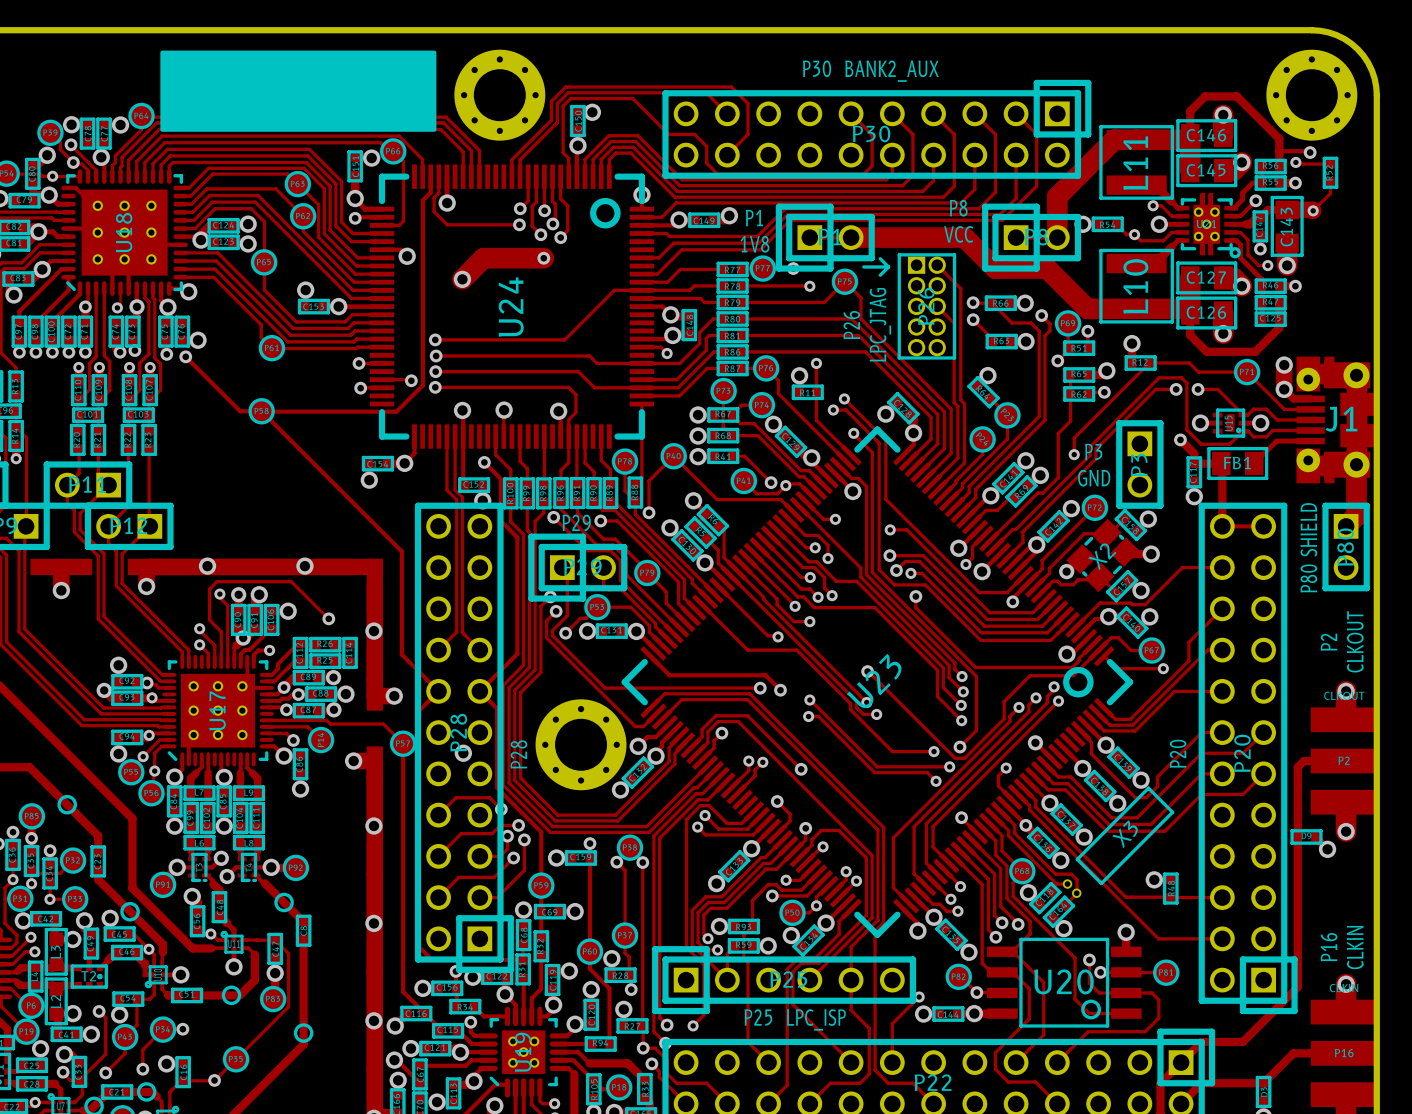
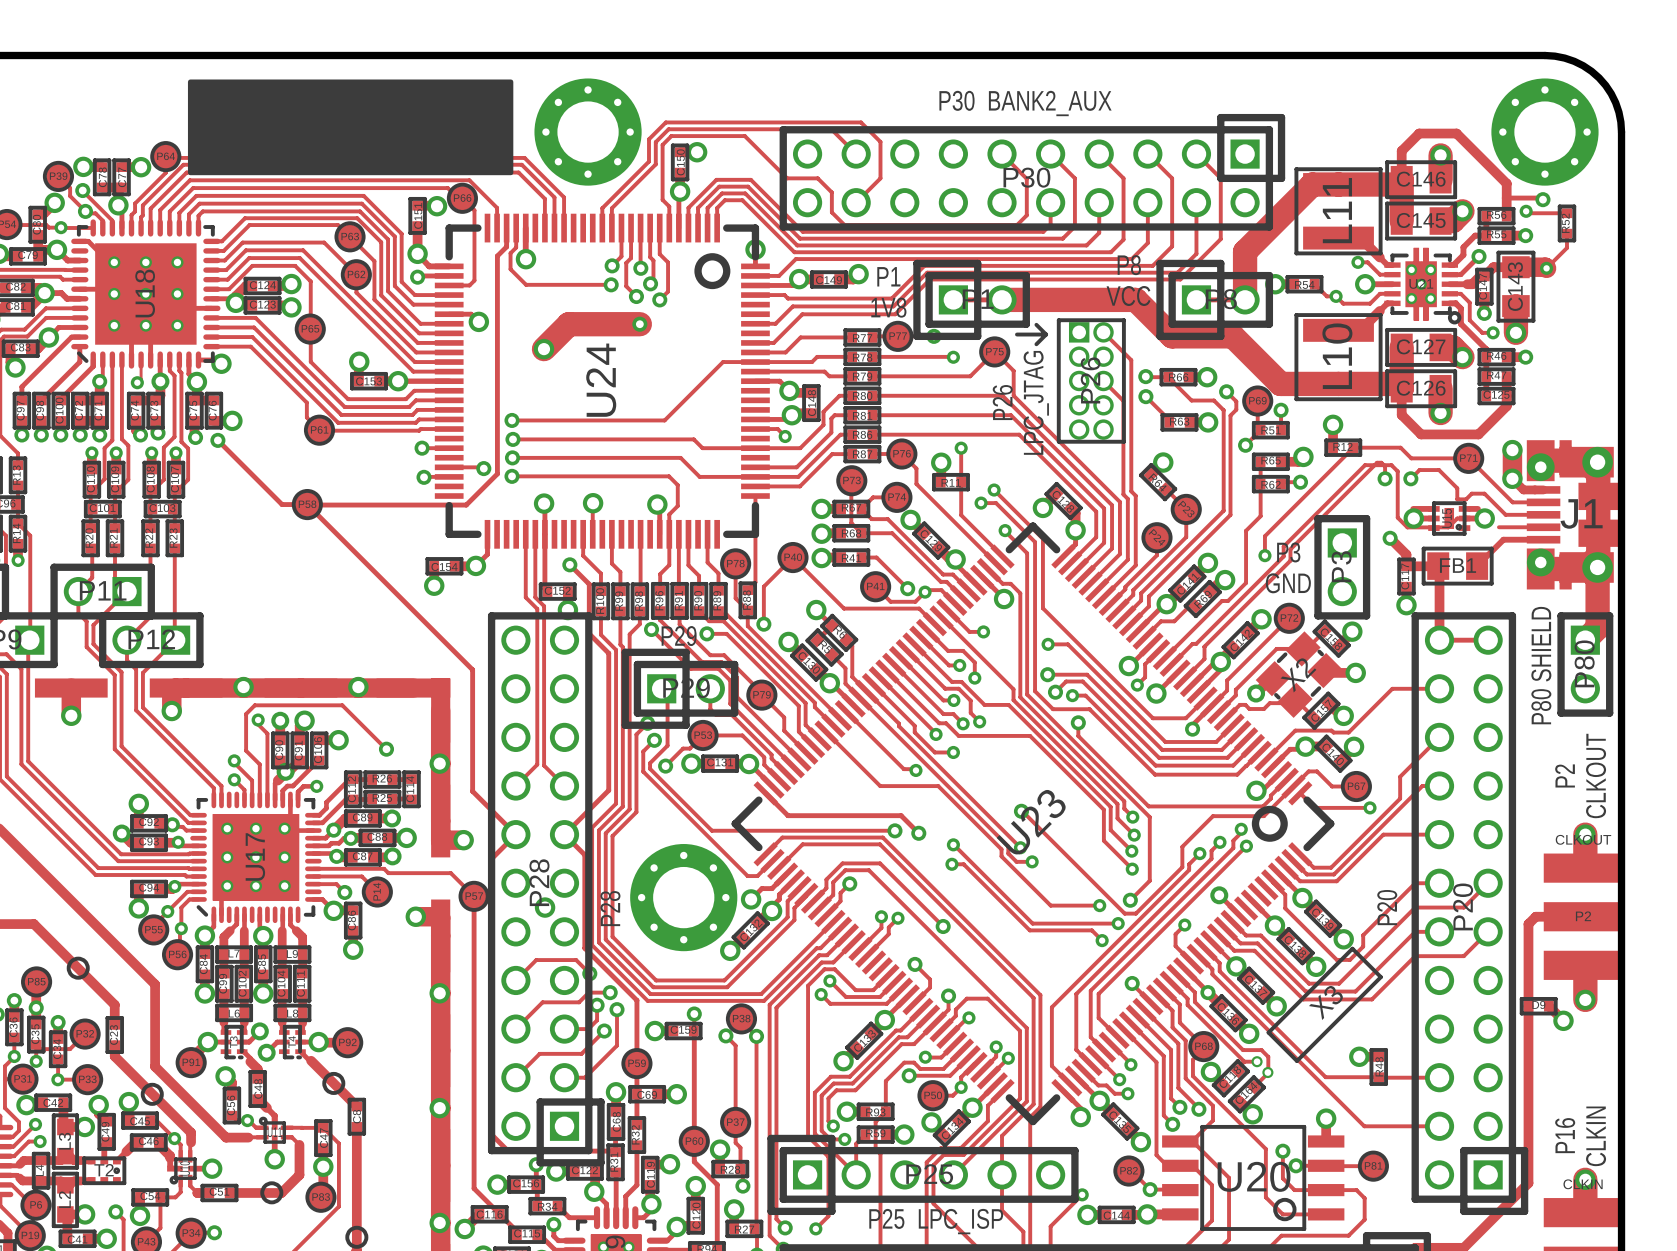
track: (1155, 389) (1176, 389) -> (1361, 478) (1377, 462) (1381, 462) (1385, 466) (1385, 478)
track: (1198, 389) (1217, 389) (1243, 414) -> (1410, 478) (1419, 470) (1439, 470) (1457, 488) (1457, 499) (1466, 499) (1471, 493) (1484, 493) (1505, 514)
track: none -> (1413, 508) (1430, 508)
track: (1247, 414) (1253, 409) (1266, 409) (1278, 419) -> (1469, 508) (1477, 508)
track: (1186, 422) (1186, 429) (1201, 444) (1229, 444) (1242, 431) (1248, 431) (1253, 436) (1266, 436) (1272, 430) -> (1397, 517) (1407, 527) (1448, 527) (1457, 518) (1464, 518)

